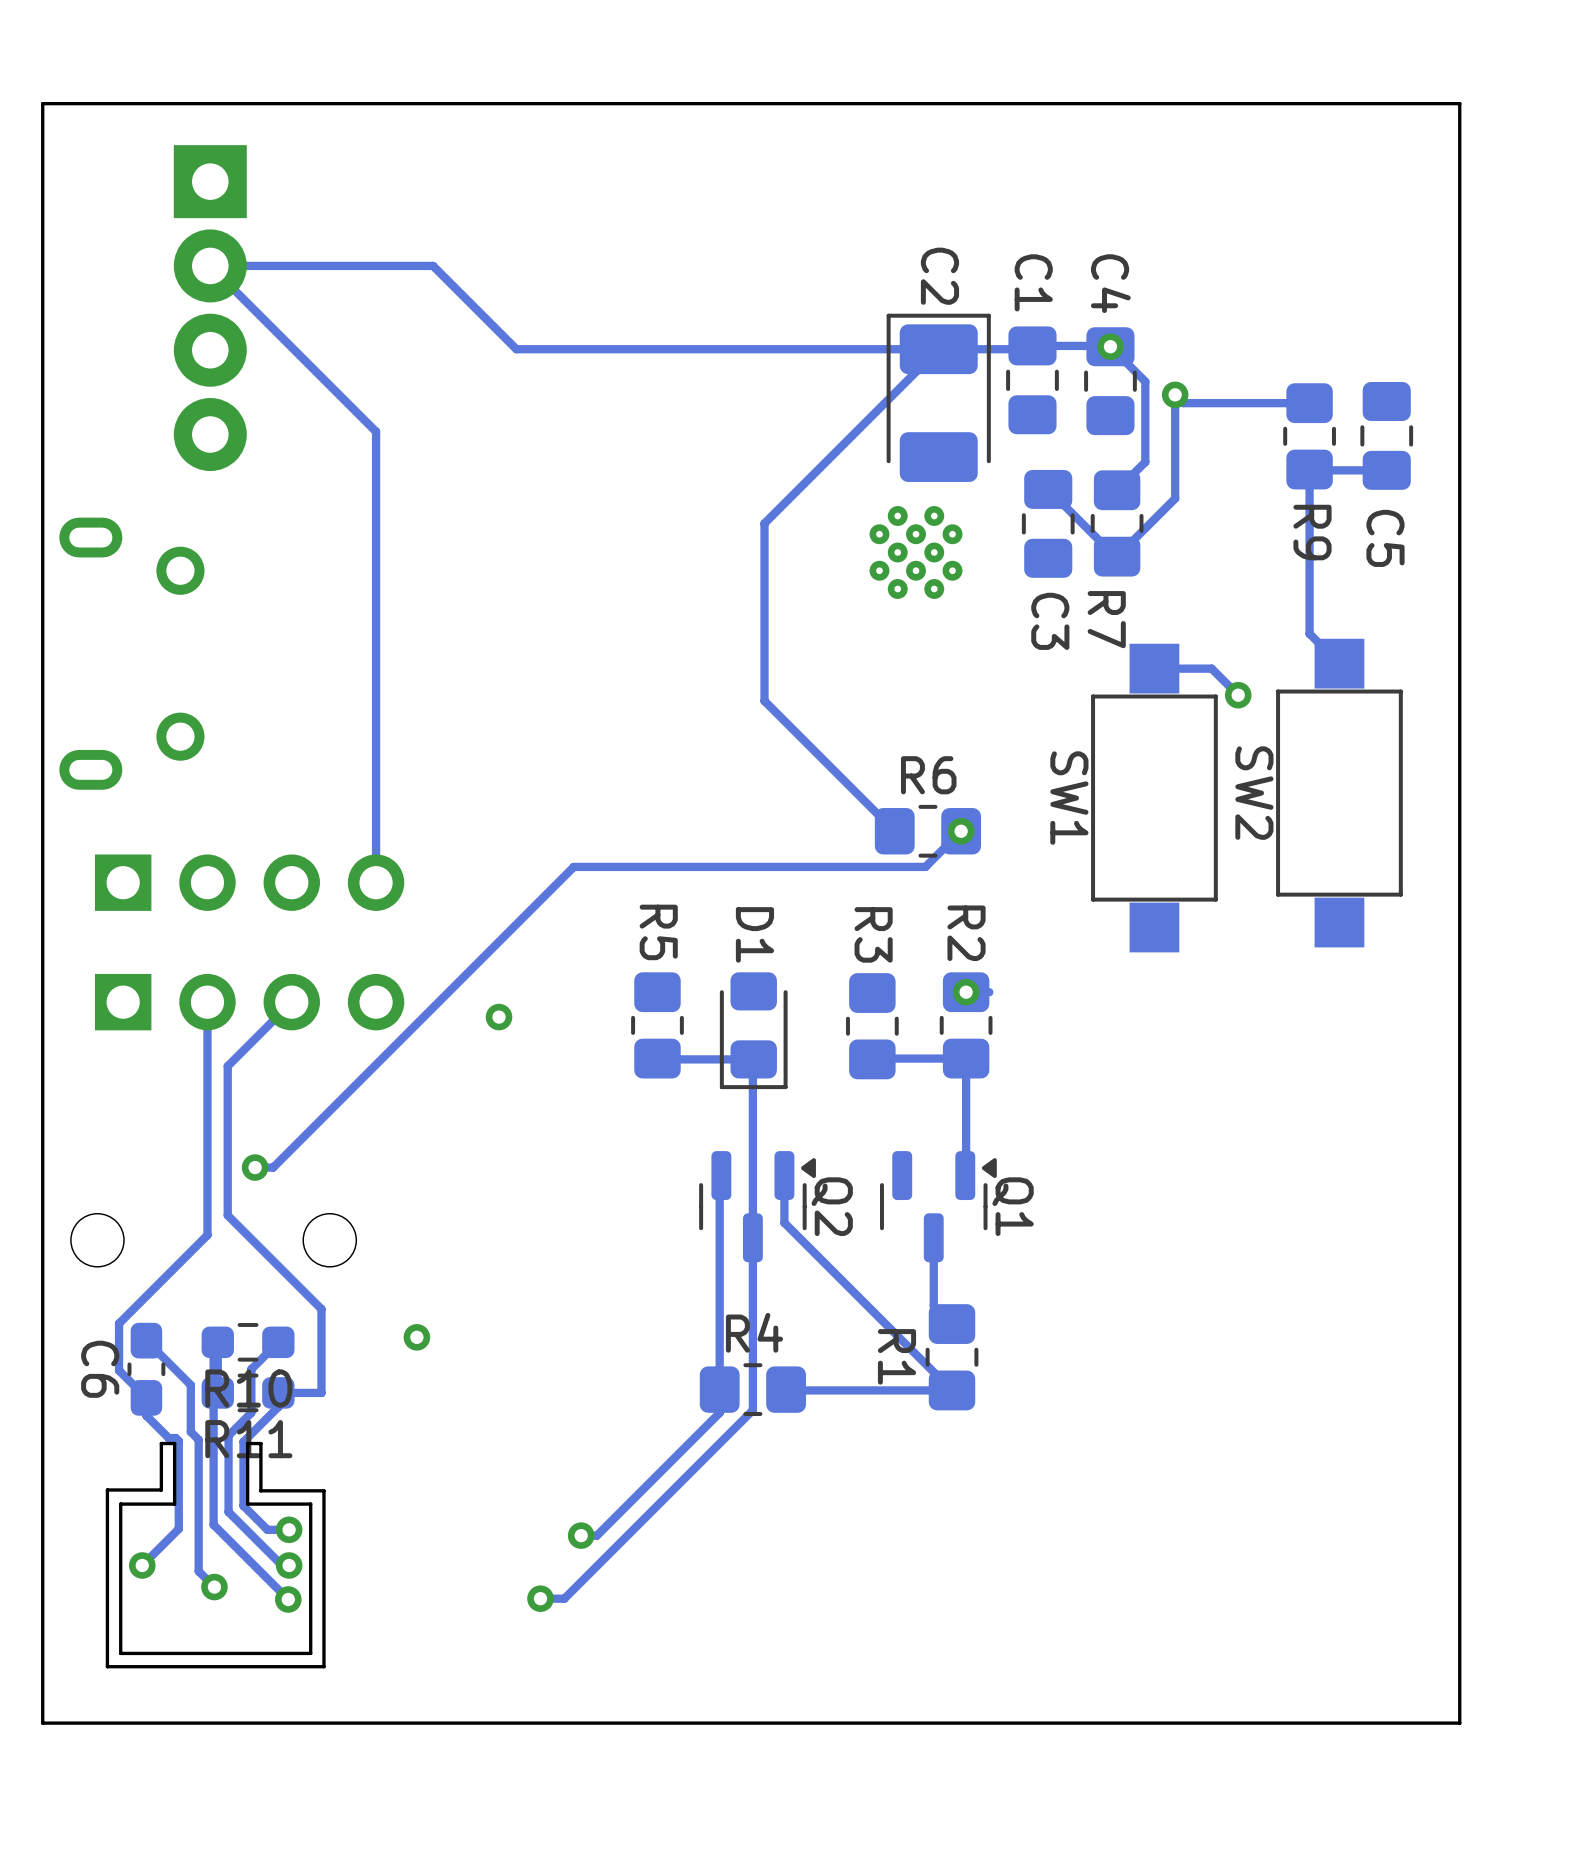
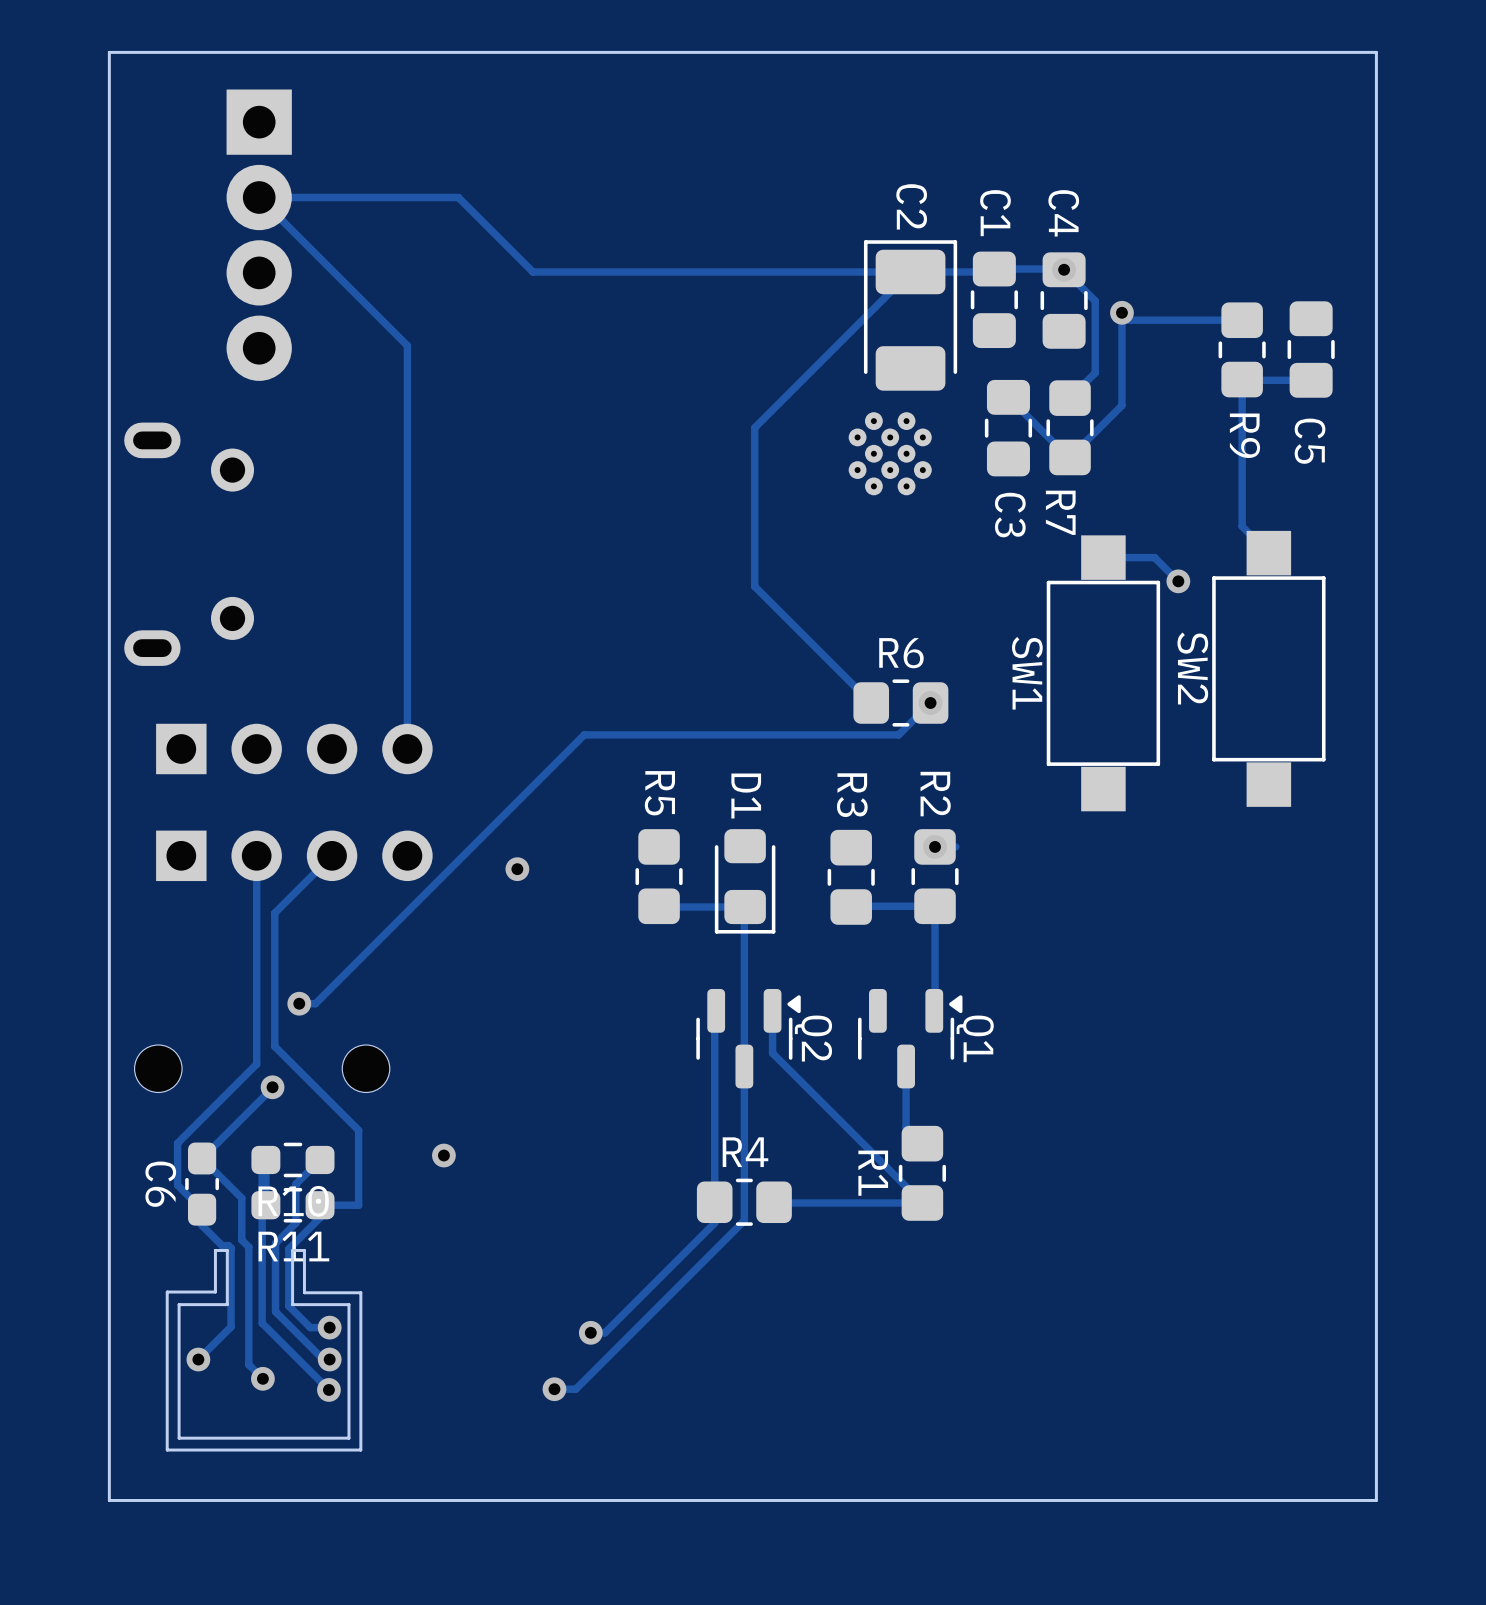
track: none -> (272, 1087) (202, 1158)
via: none -> (272, 1087)

